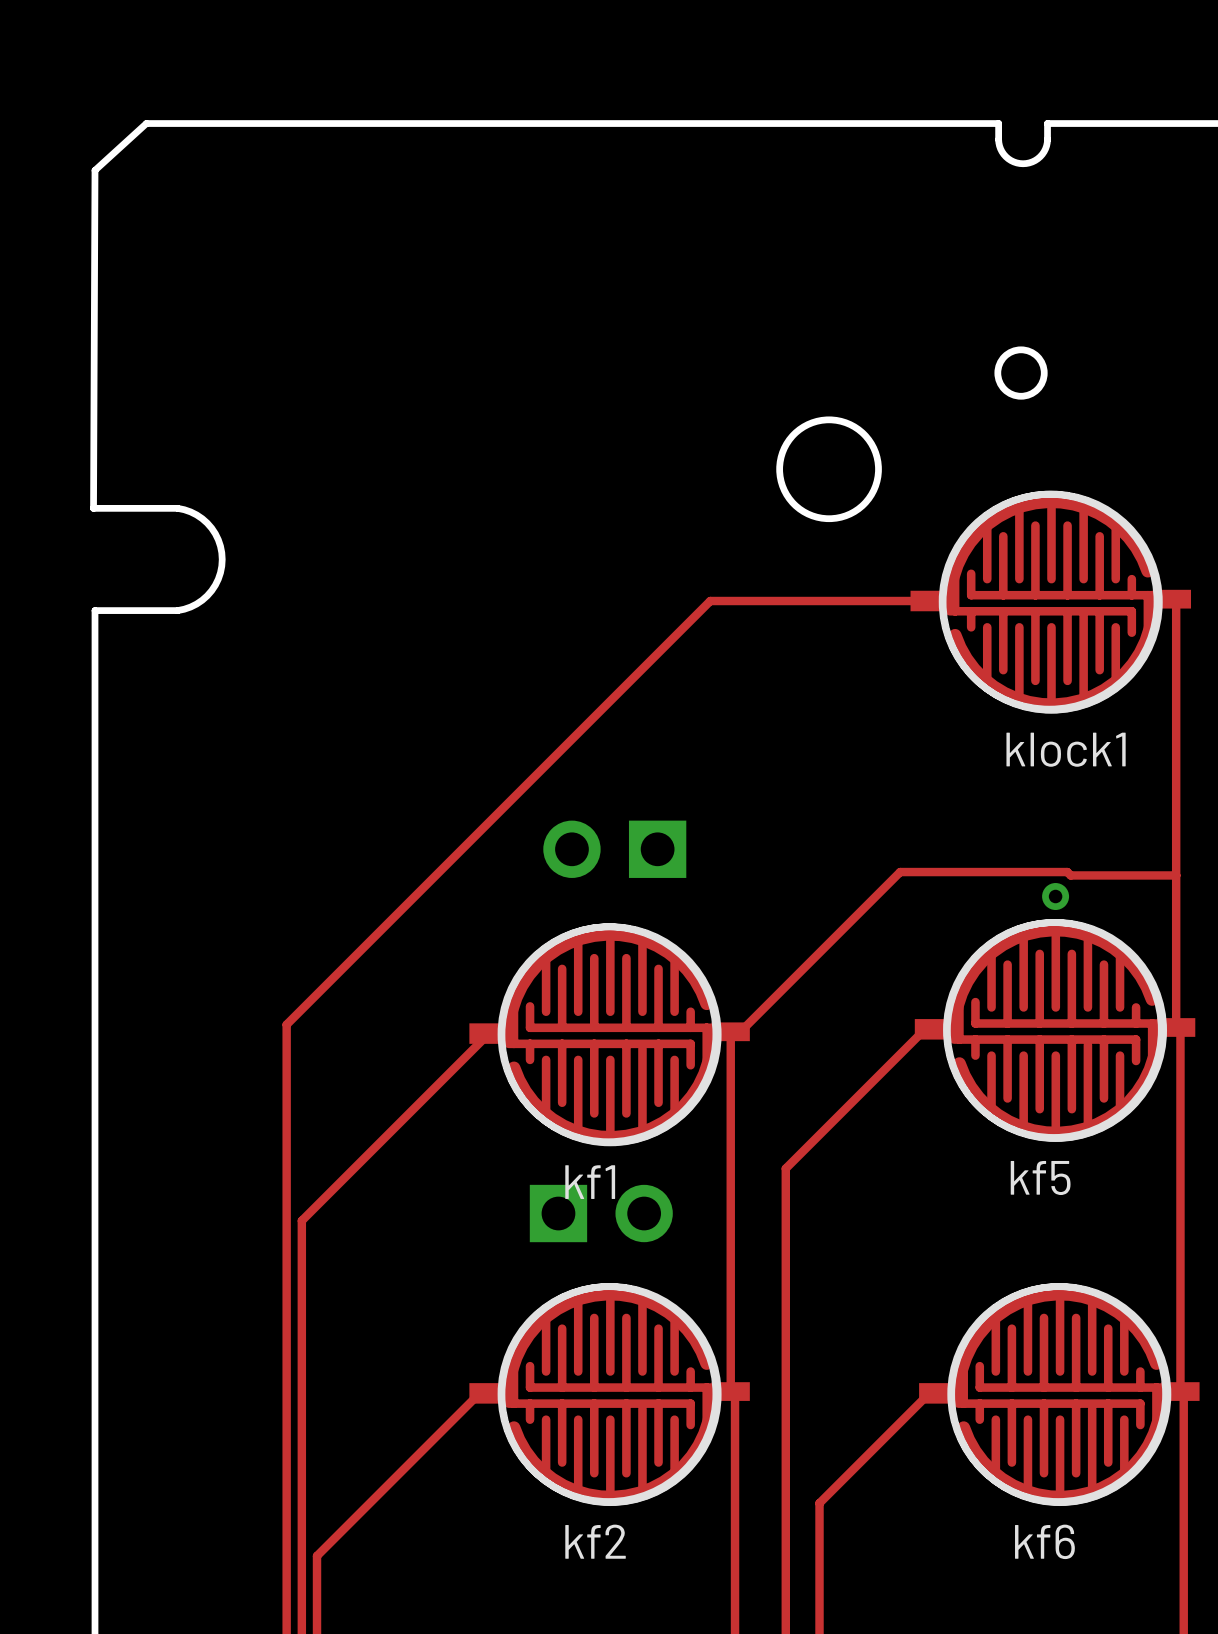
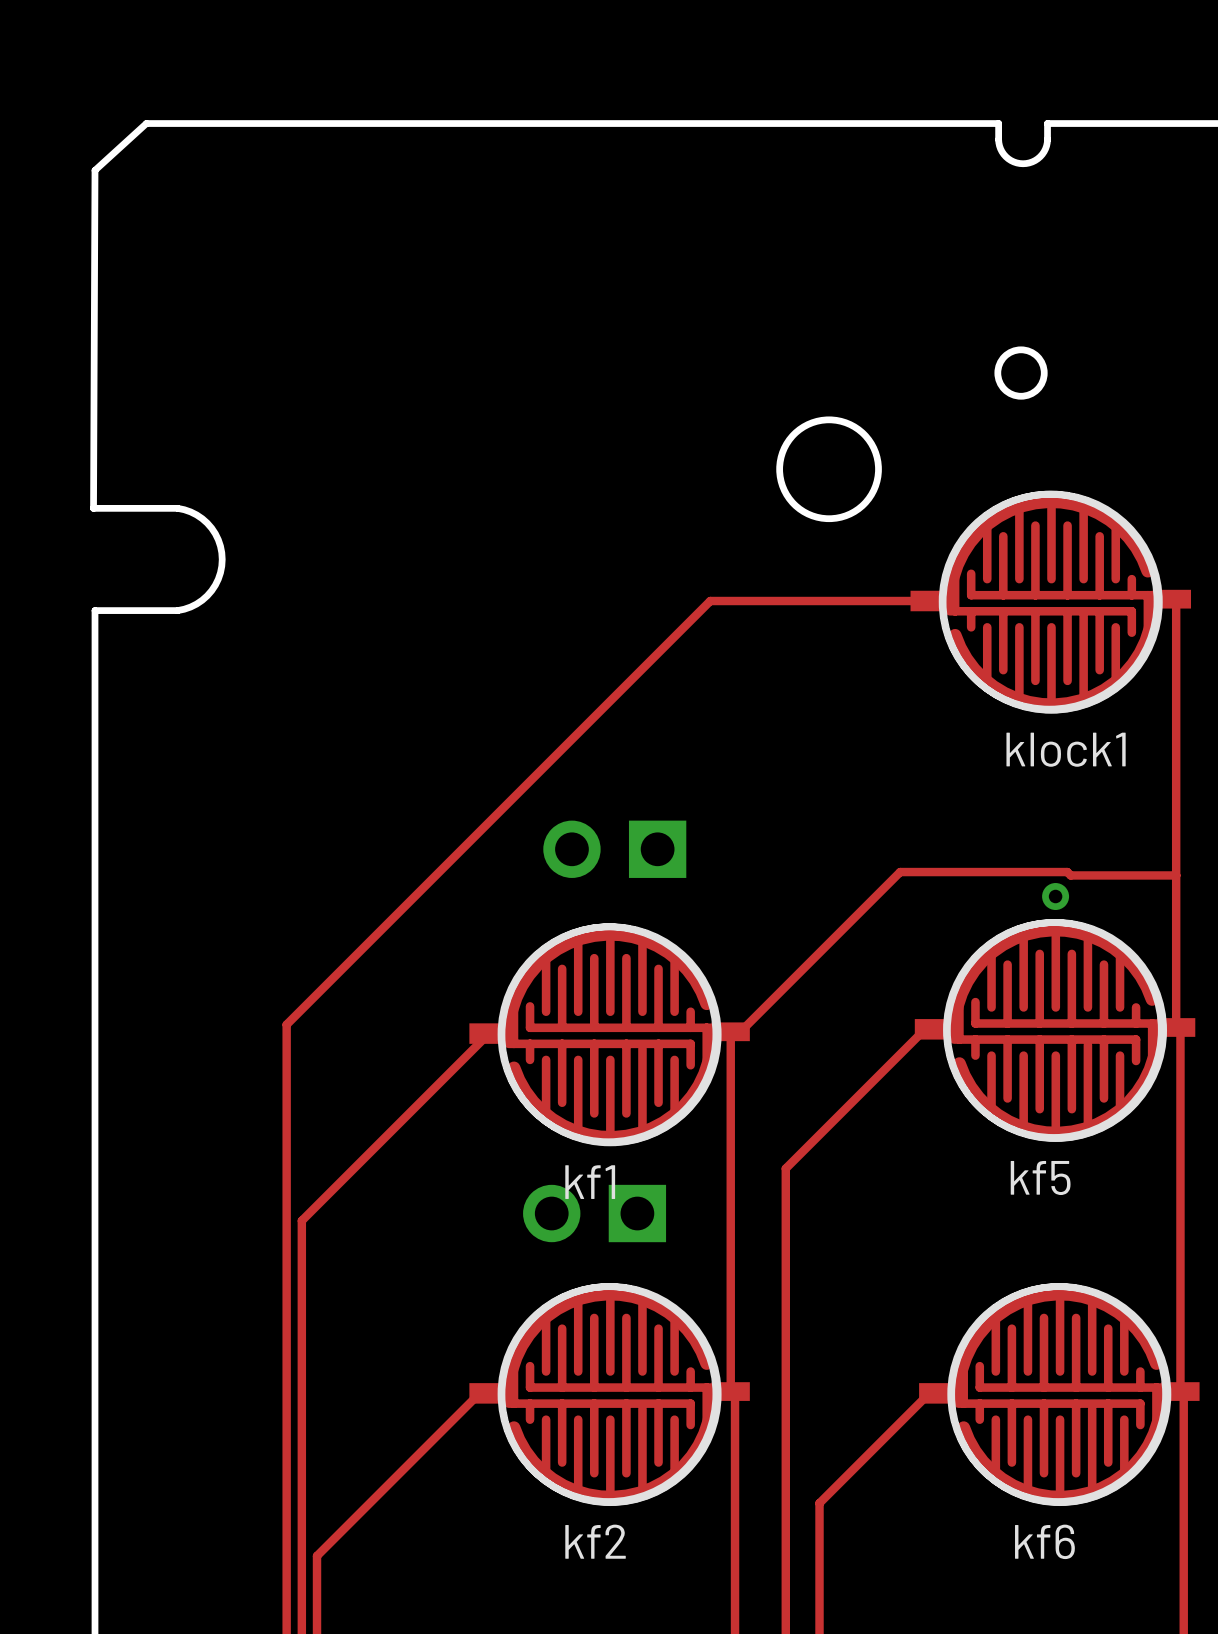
part rotation: 0° (601, 1213) -> 180° (594, 1213)

